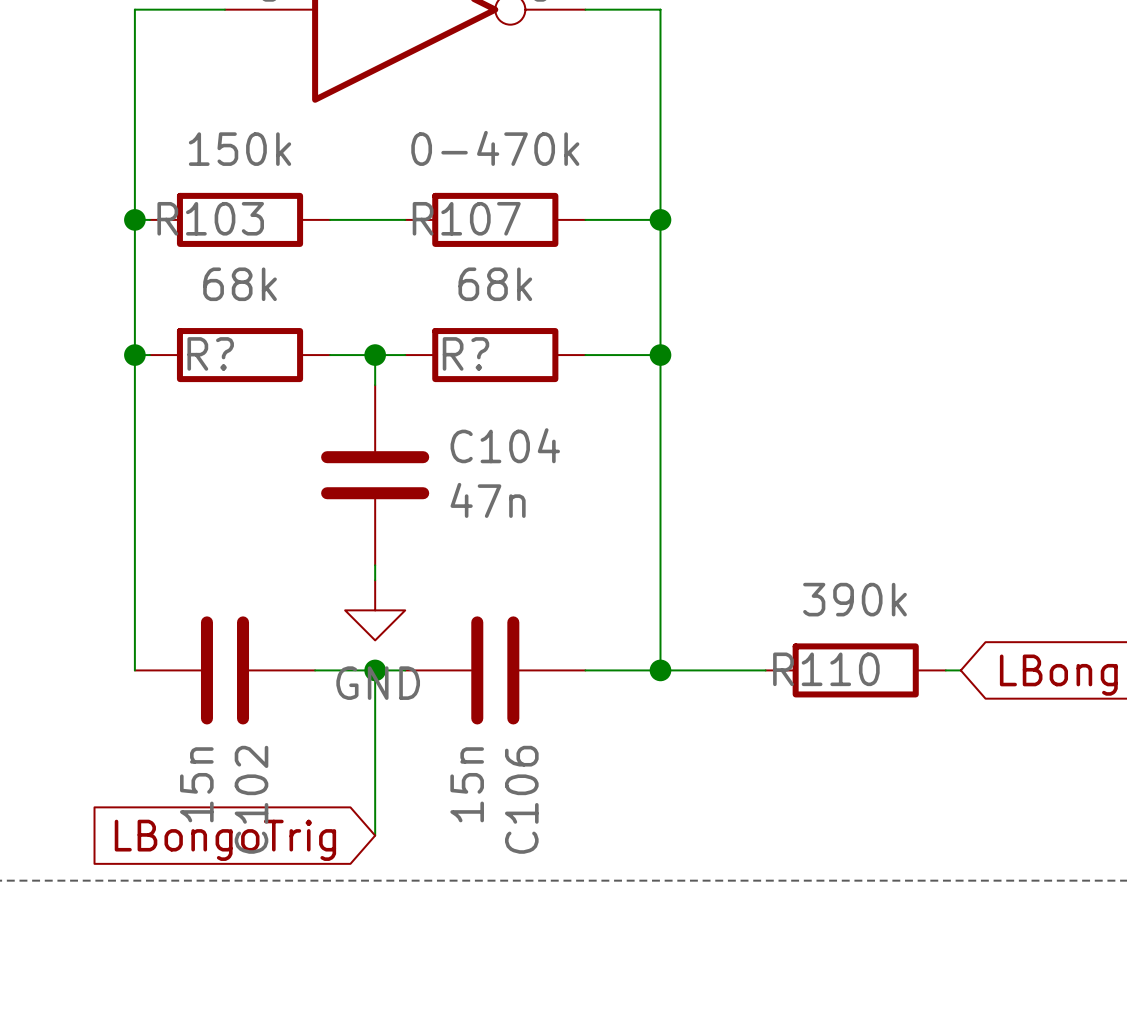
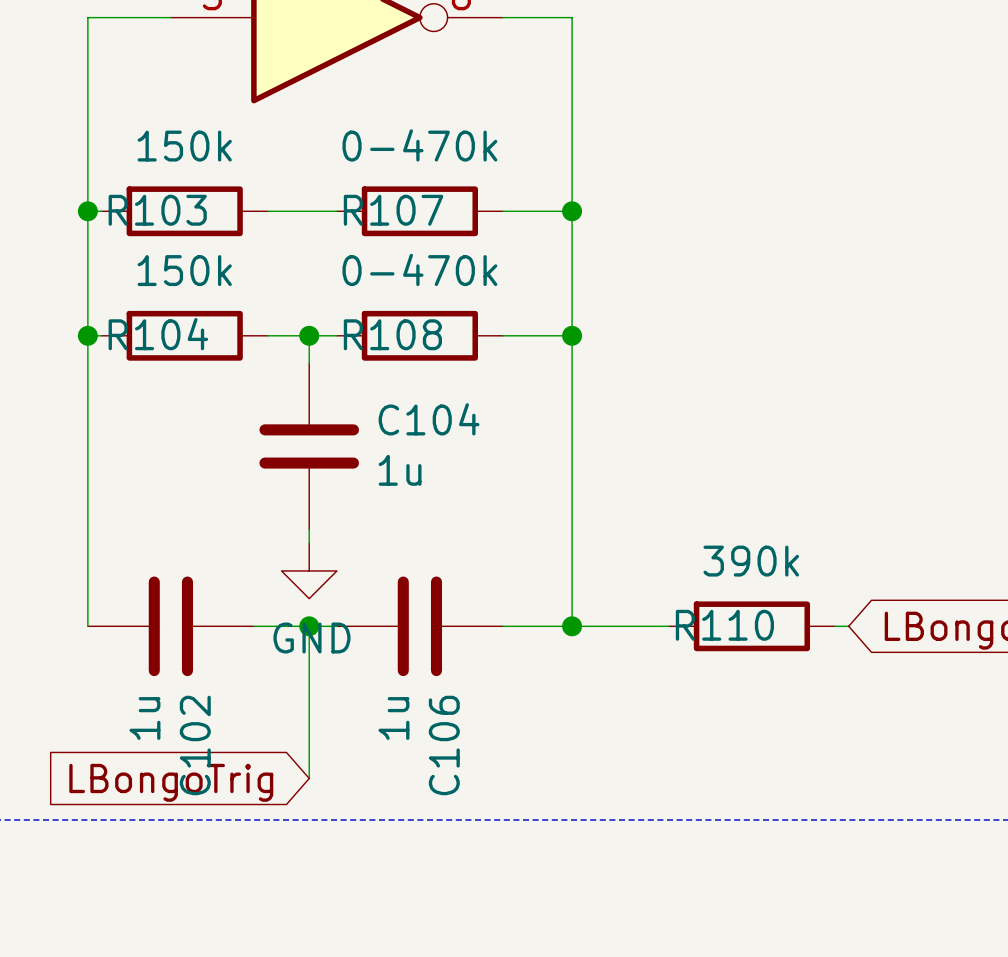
R? value: 68k (240, 284) -> 150k (184, 270)
R? value: 68k (495, 284) -> 0-470k (419, 269)
R? name: R? (210, 353) -> R104 (158, 334)
R? name: R? (465, 353) -> R108 (392, 334)
C104 value: 47n (488, 500) -> 1u (400, 470)
C102 value: 15n (196, 784) -> 1u (144, 718)
C106 value: 15n (467, 784) -> 1u (393, 718)

